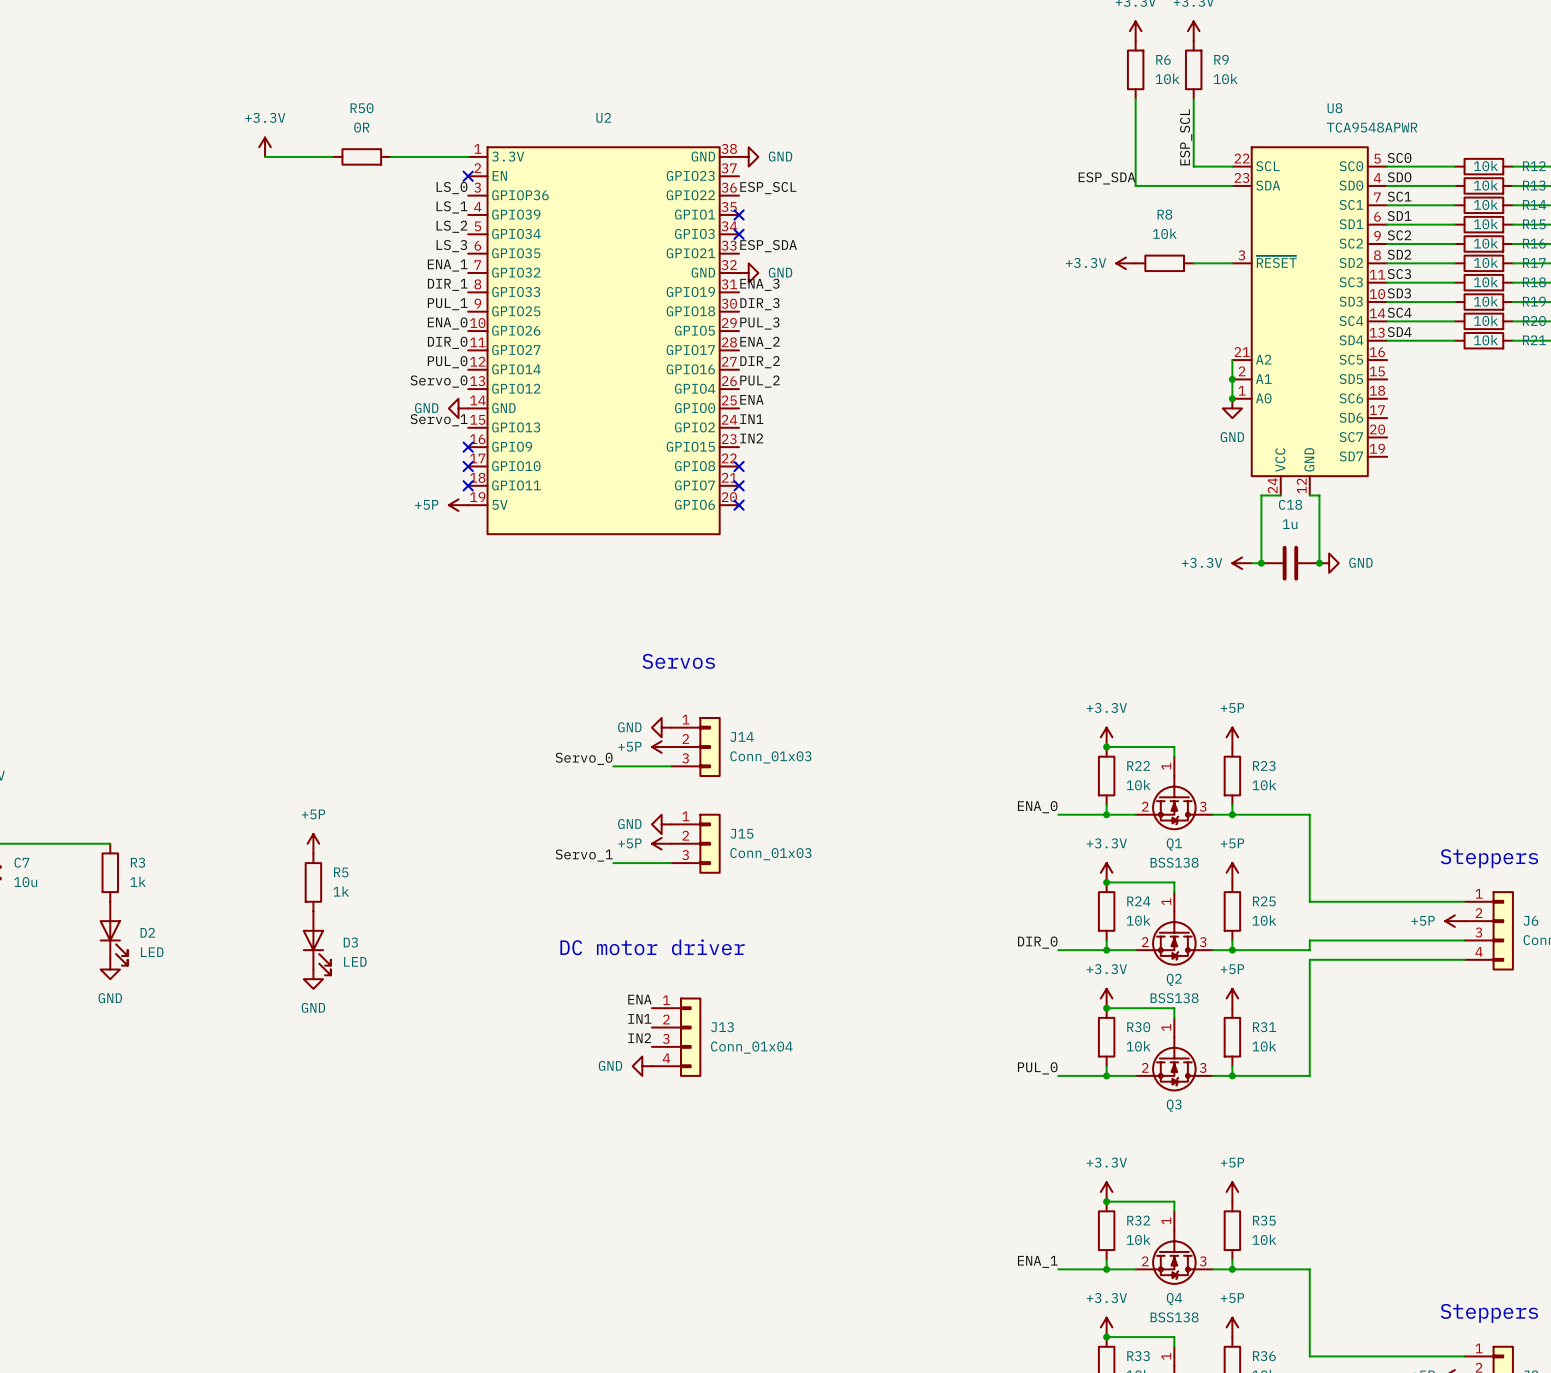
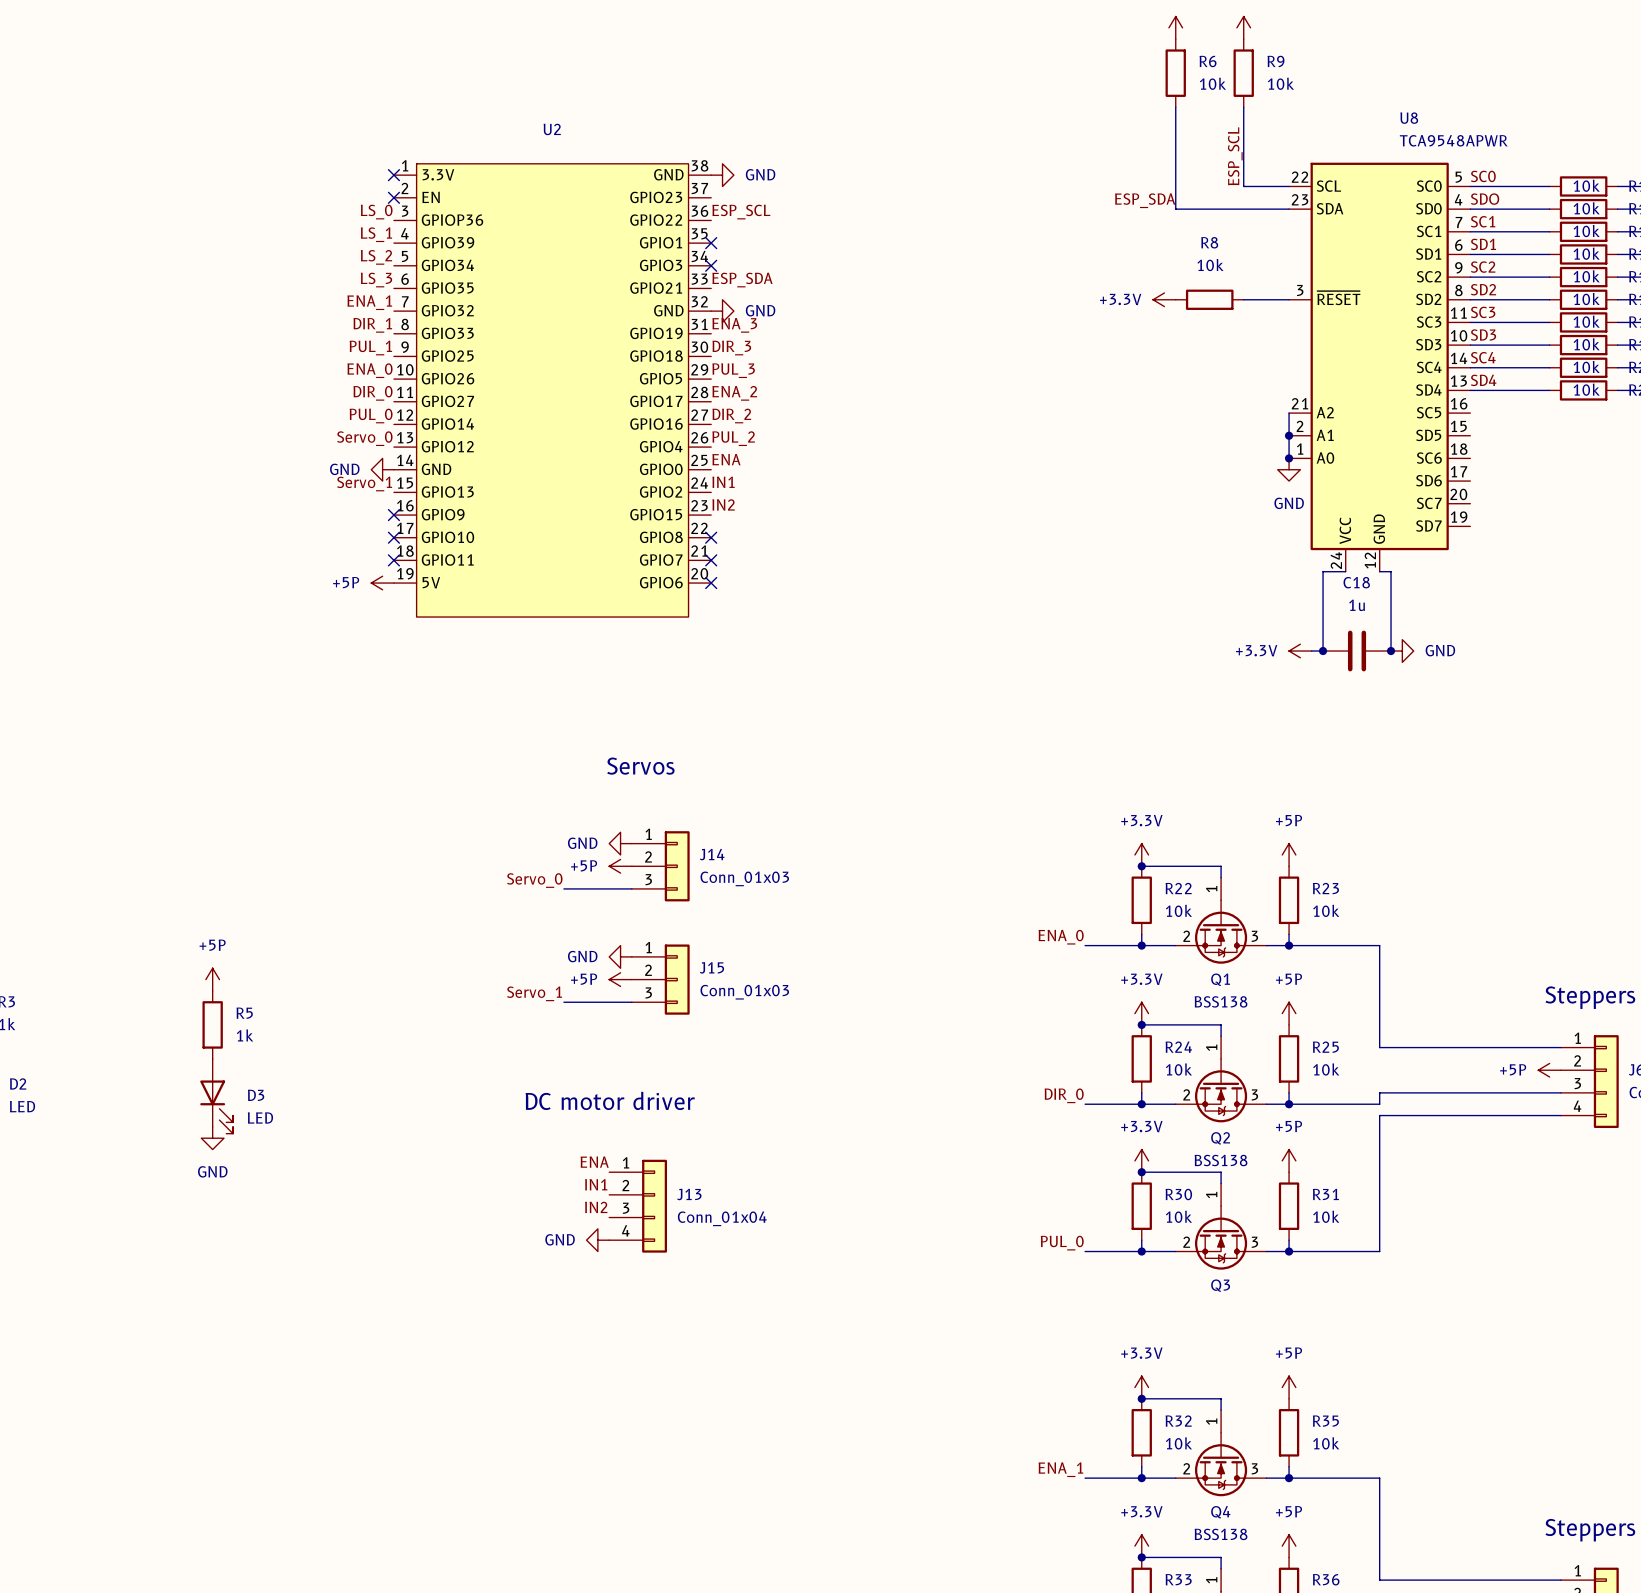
power symbol: +3.3V (265, 147) -> none
wire: (265, 156) (332, 156) -> none
R50: 0R (361, 156) -> none
wire: (390, 156) (468, 156) -> none
no-connect mark: none -> (393, 175)

